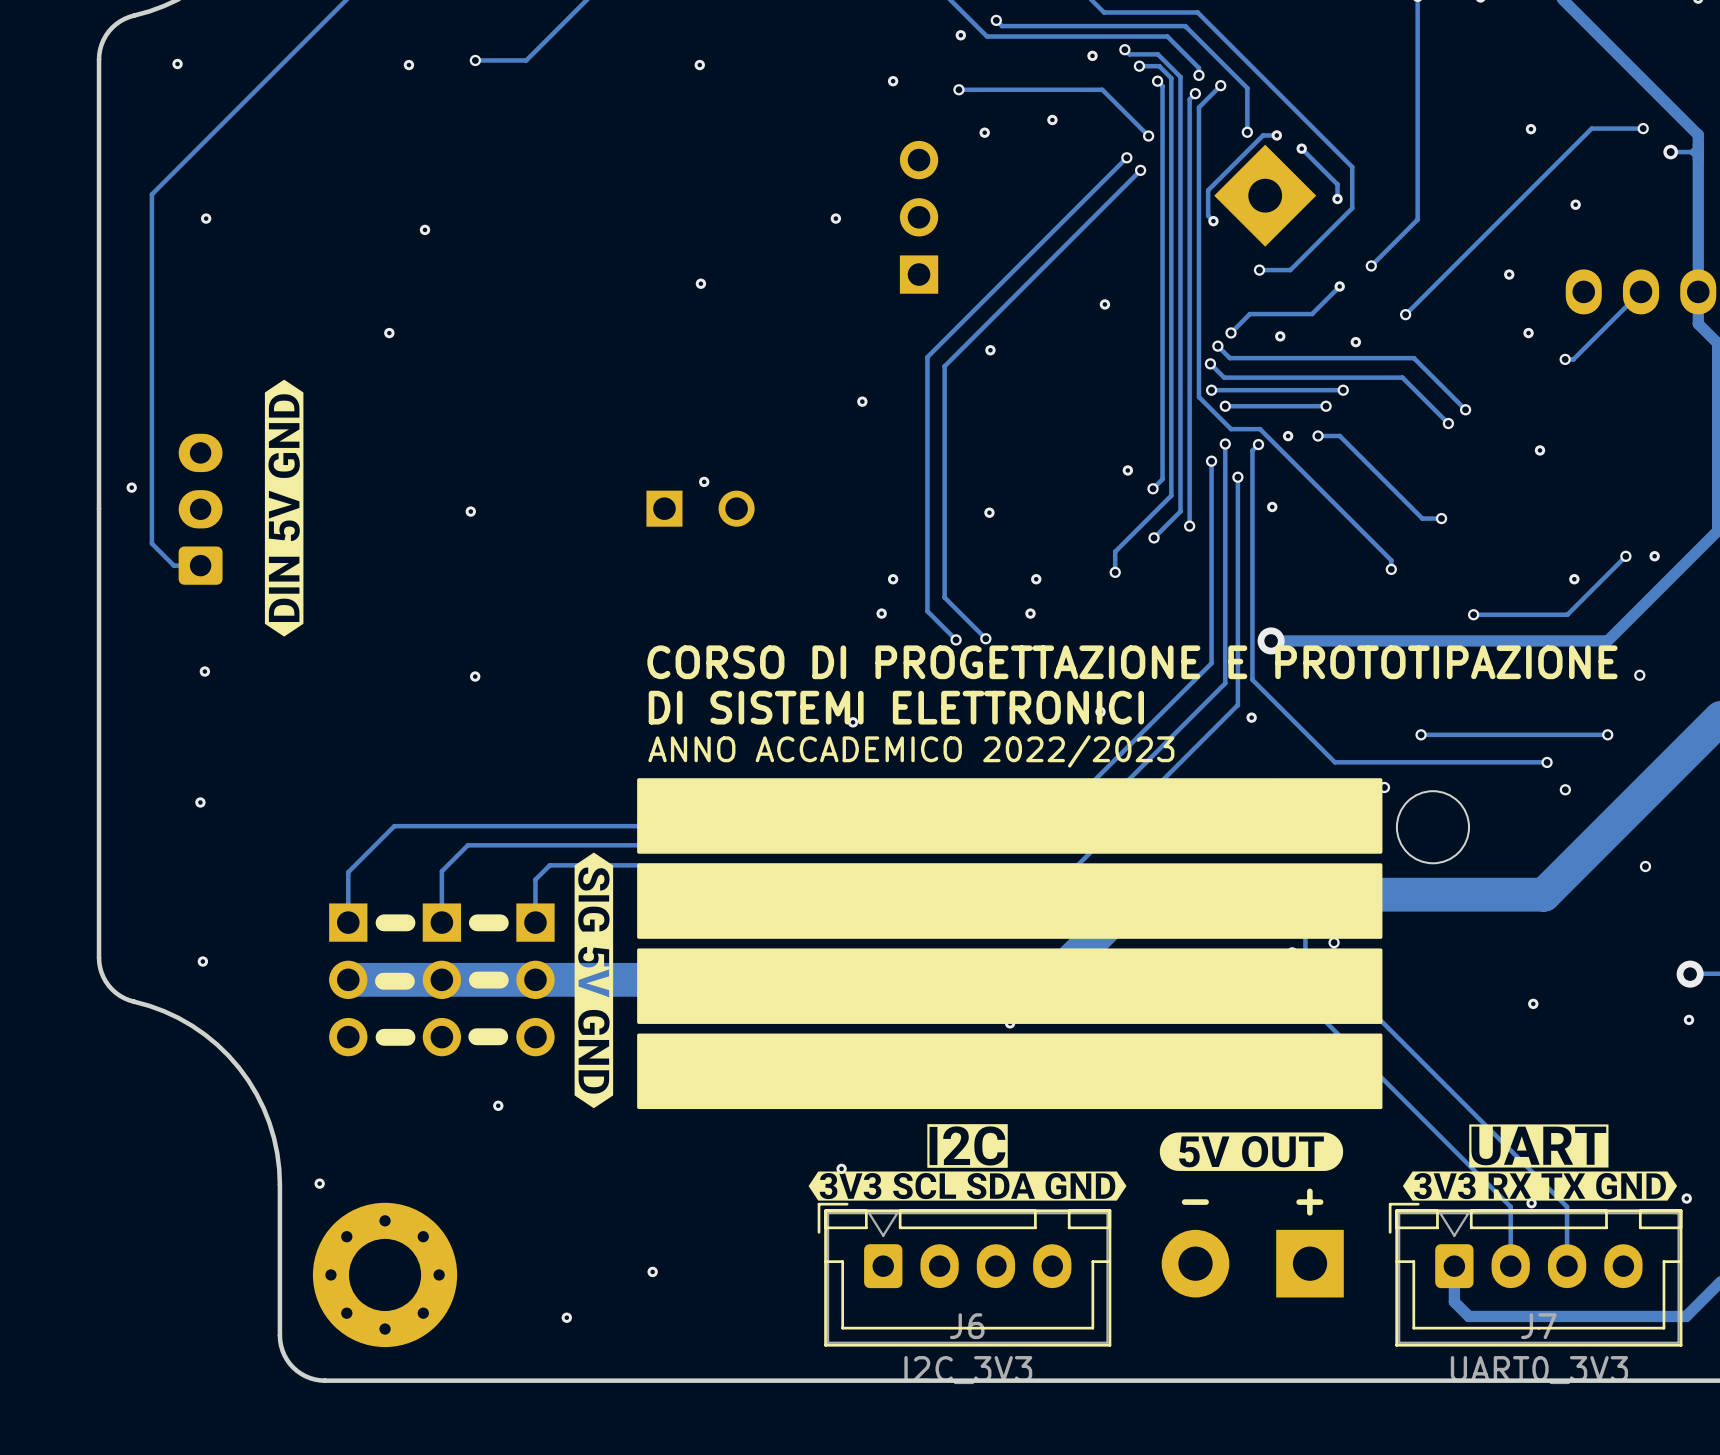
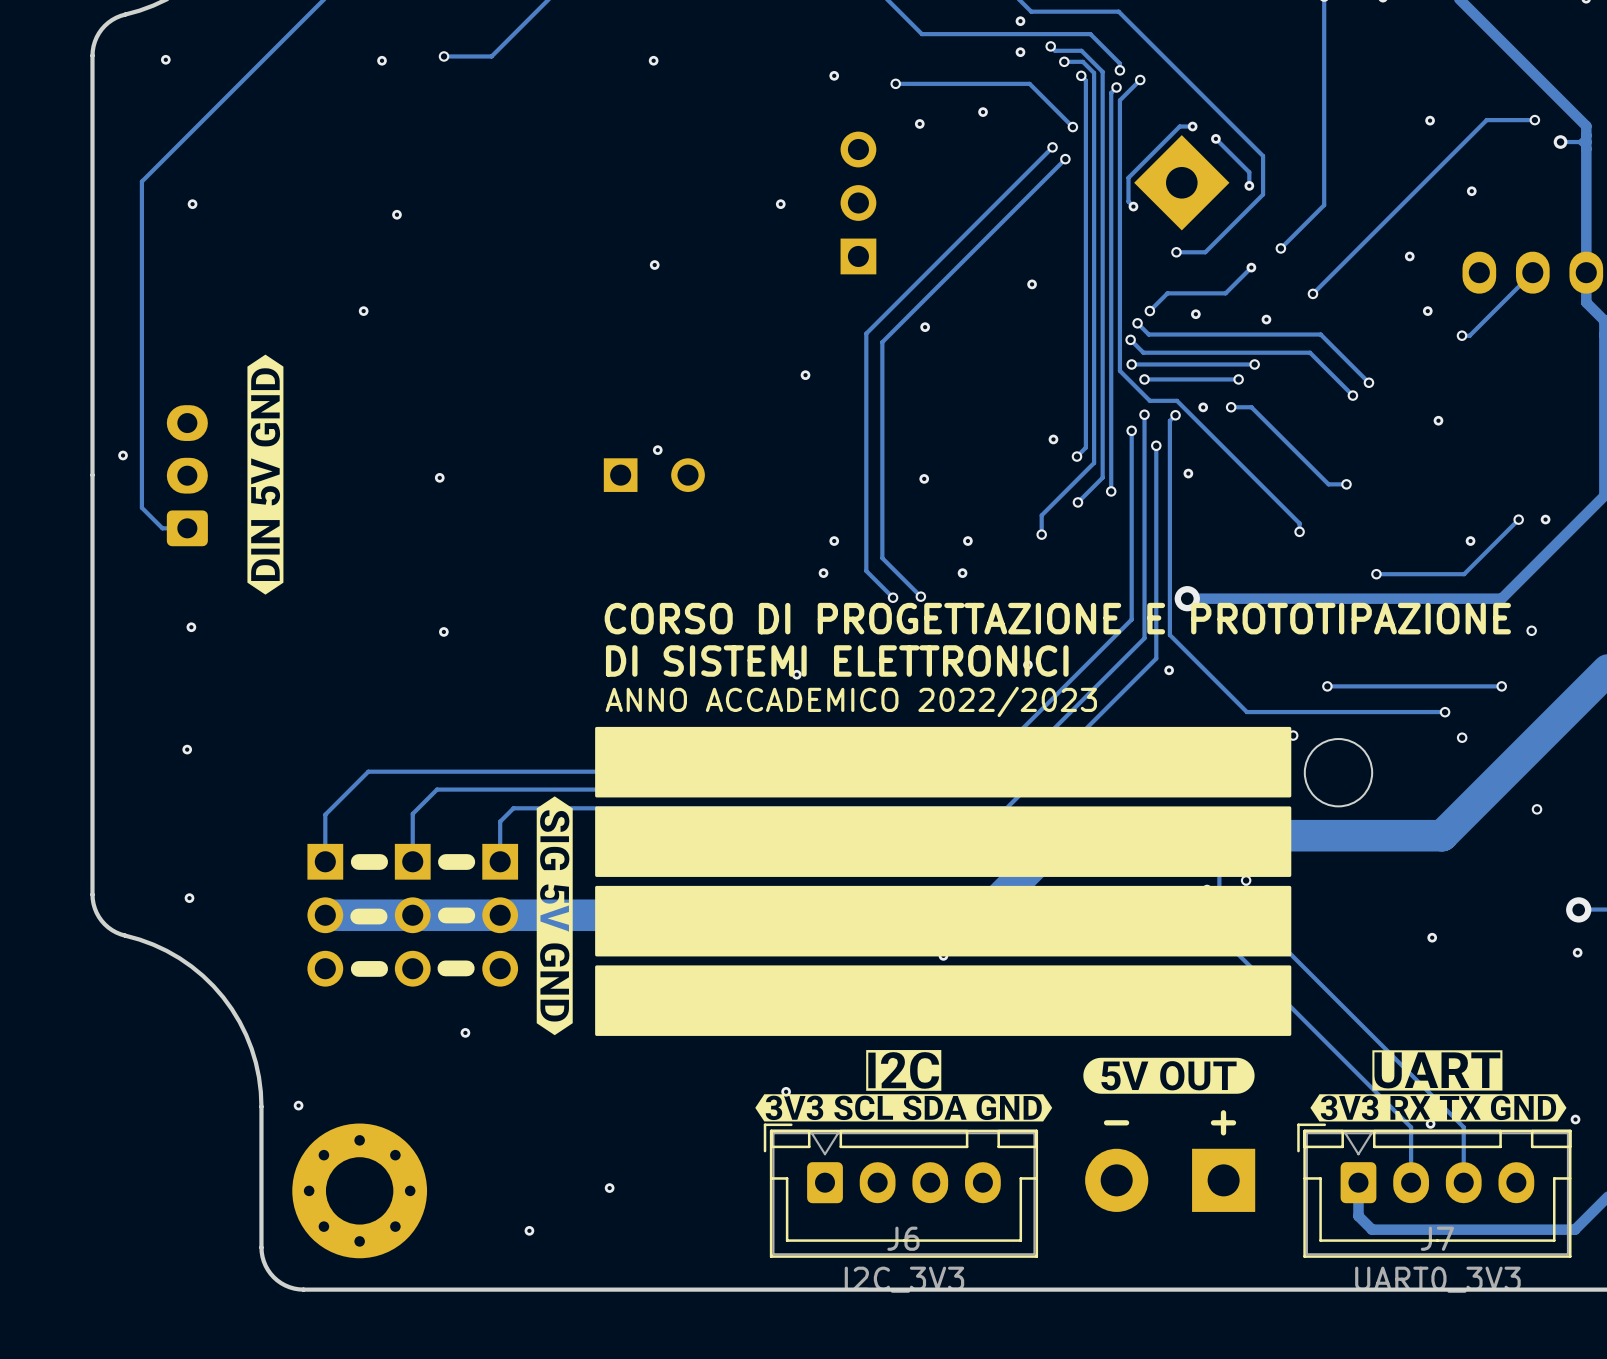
track: (996, 20) (1002, 26) (1185, 26) (1247, 88) (1247, 132) -> none
via: (996, 20) -> none
via: none -> (1020, 21)
via: (960, 35) -> none
via: (1247, 132) -> none

